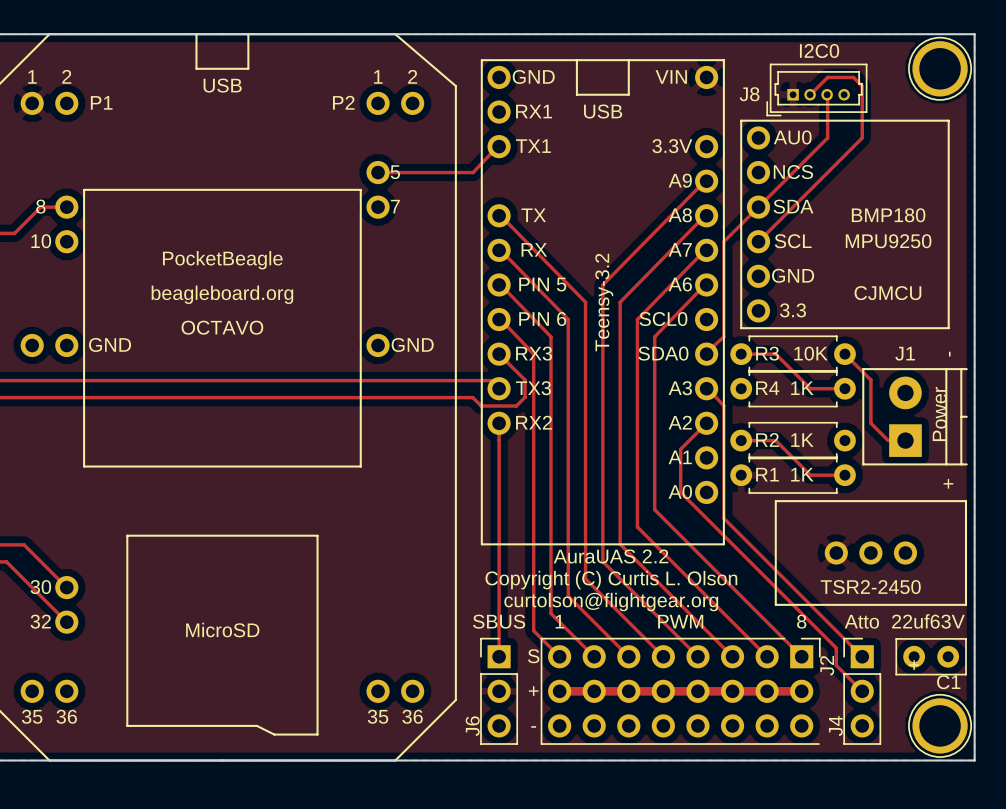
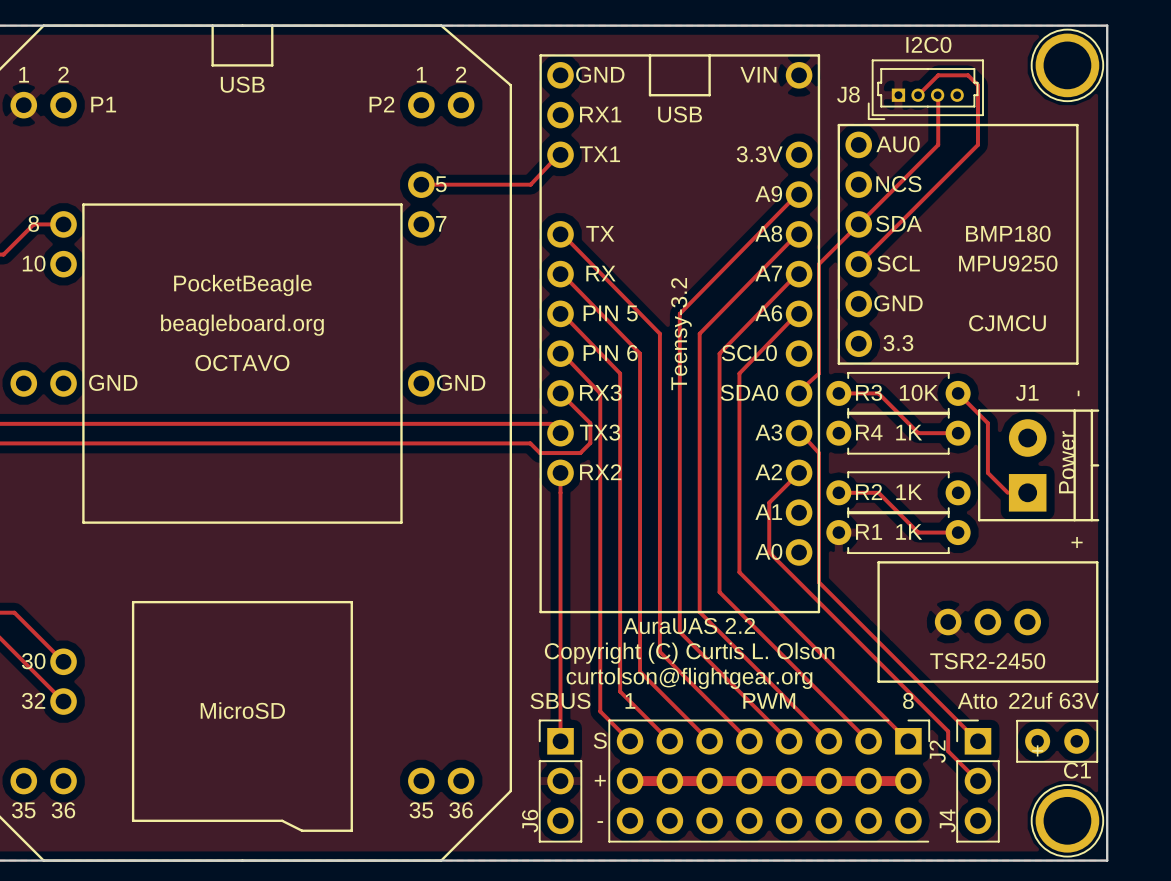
C1 value: 22uf63V (928, 621) -> 22uf 63V (1054, 700)

